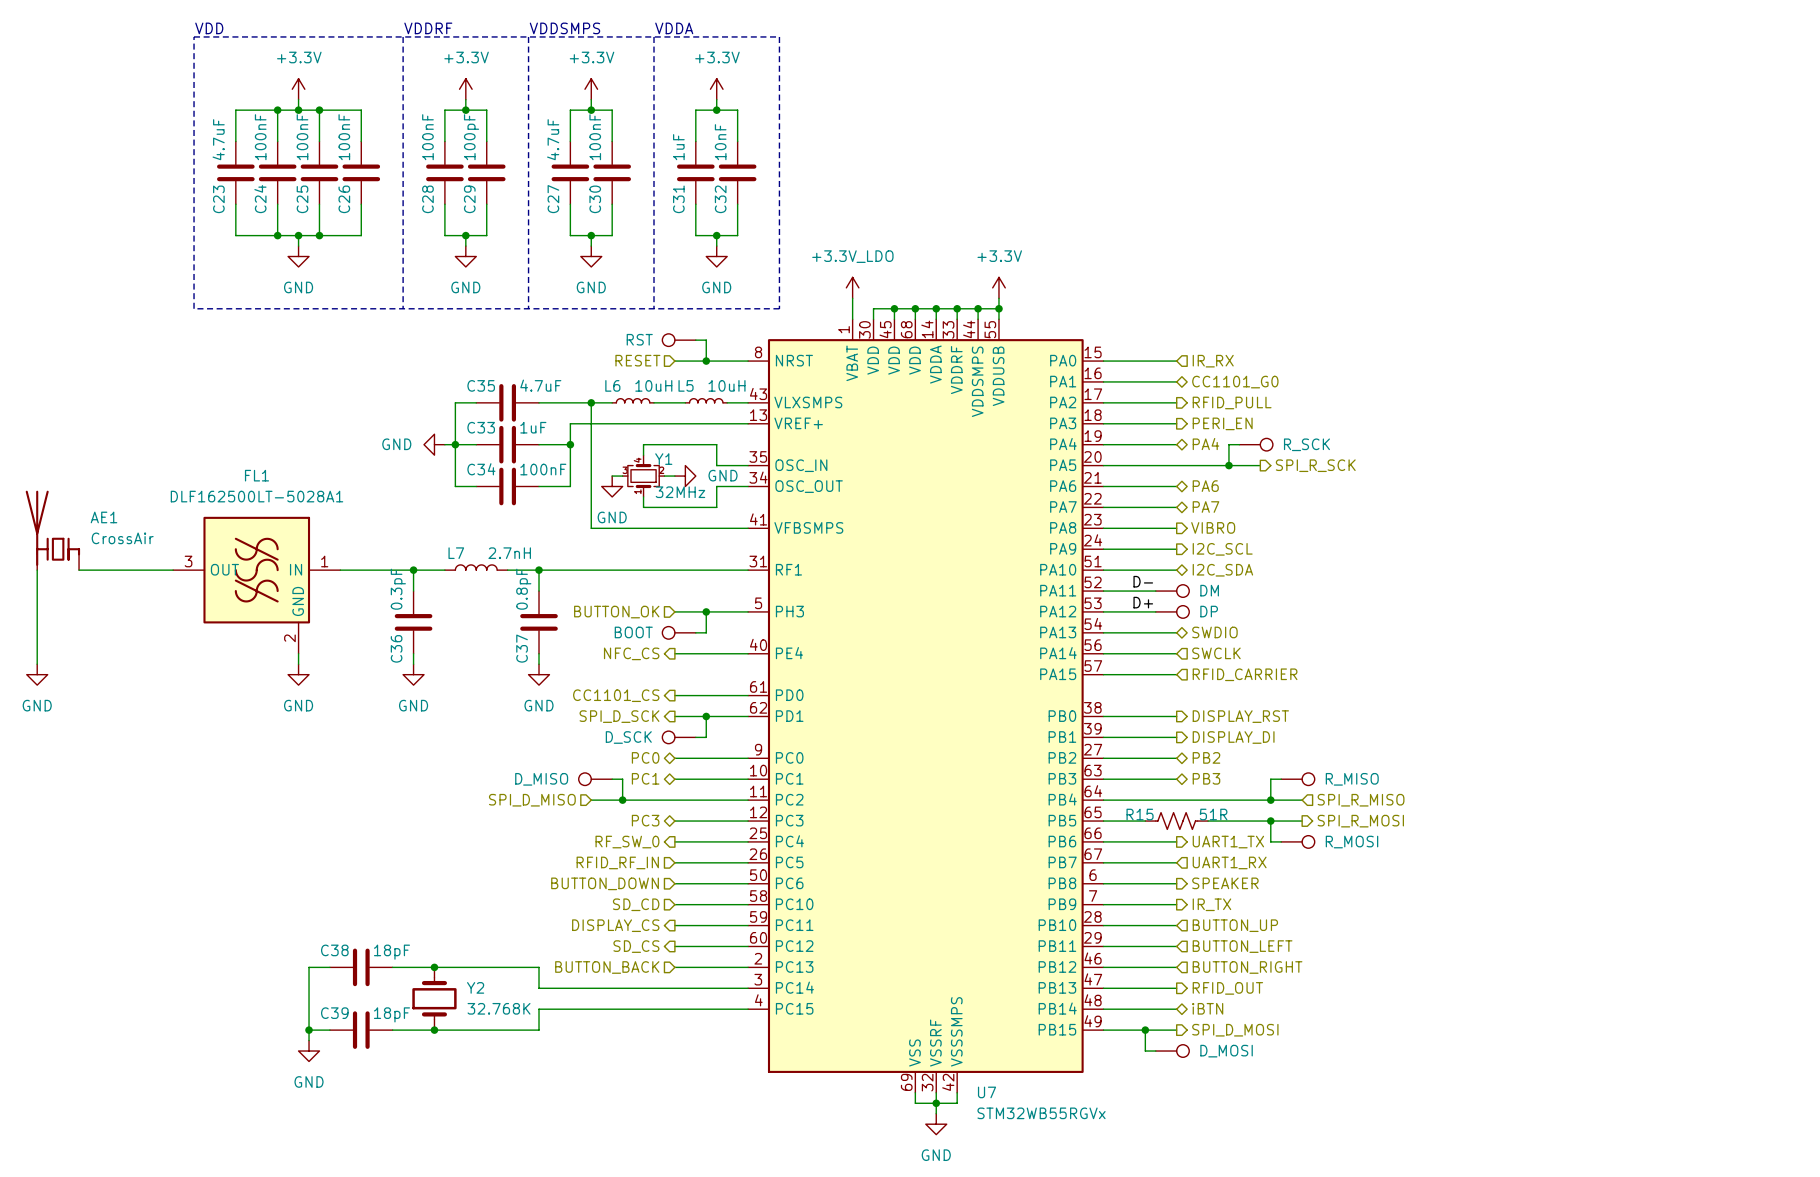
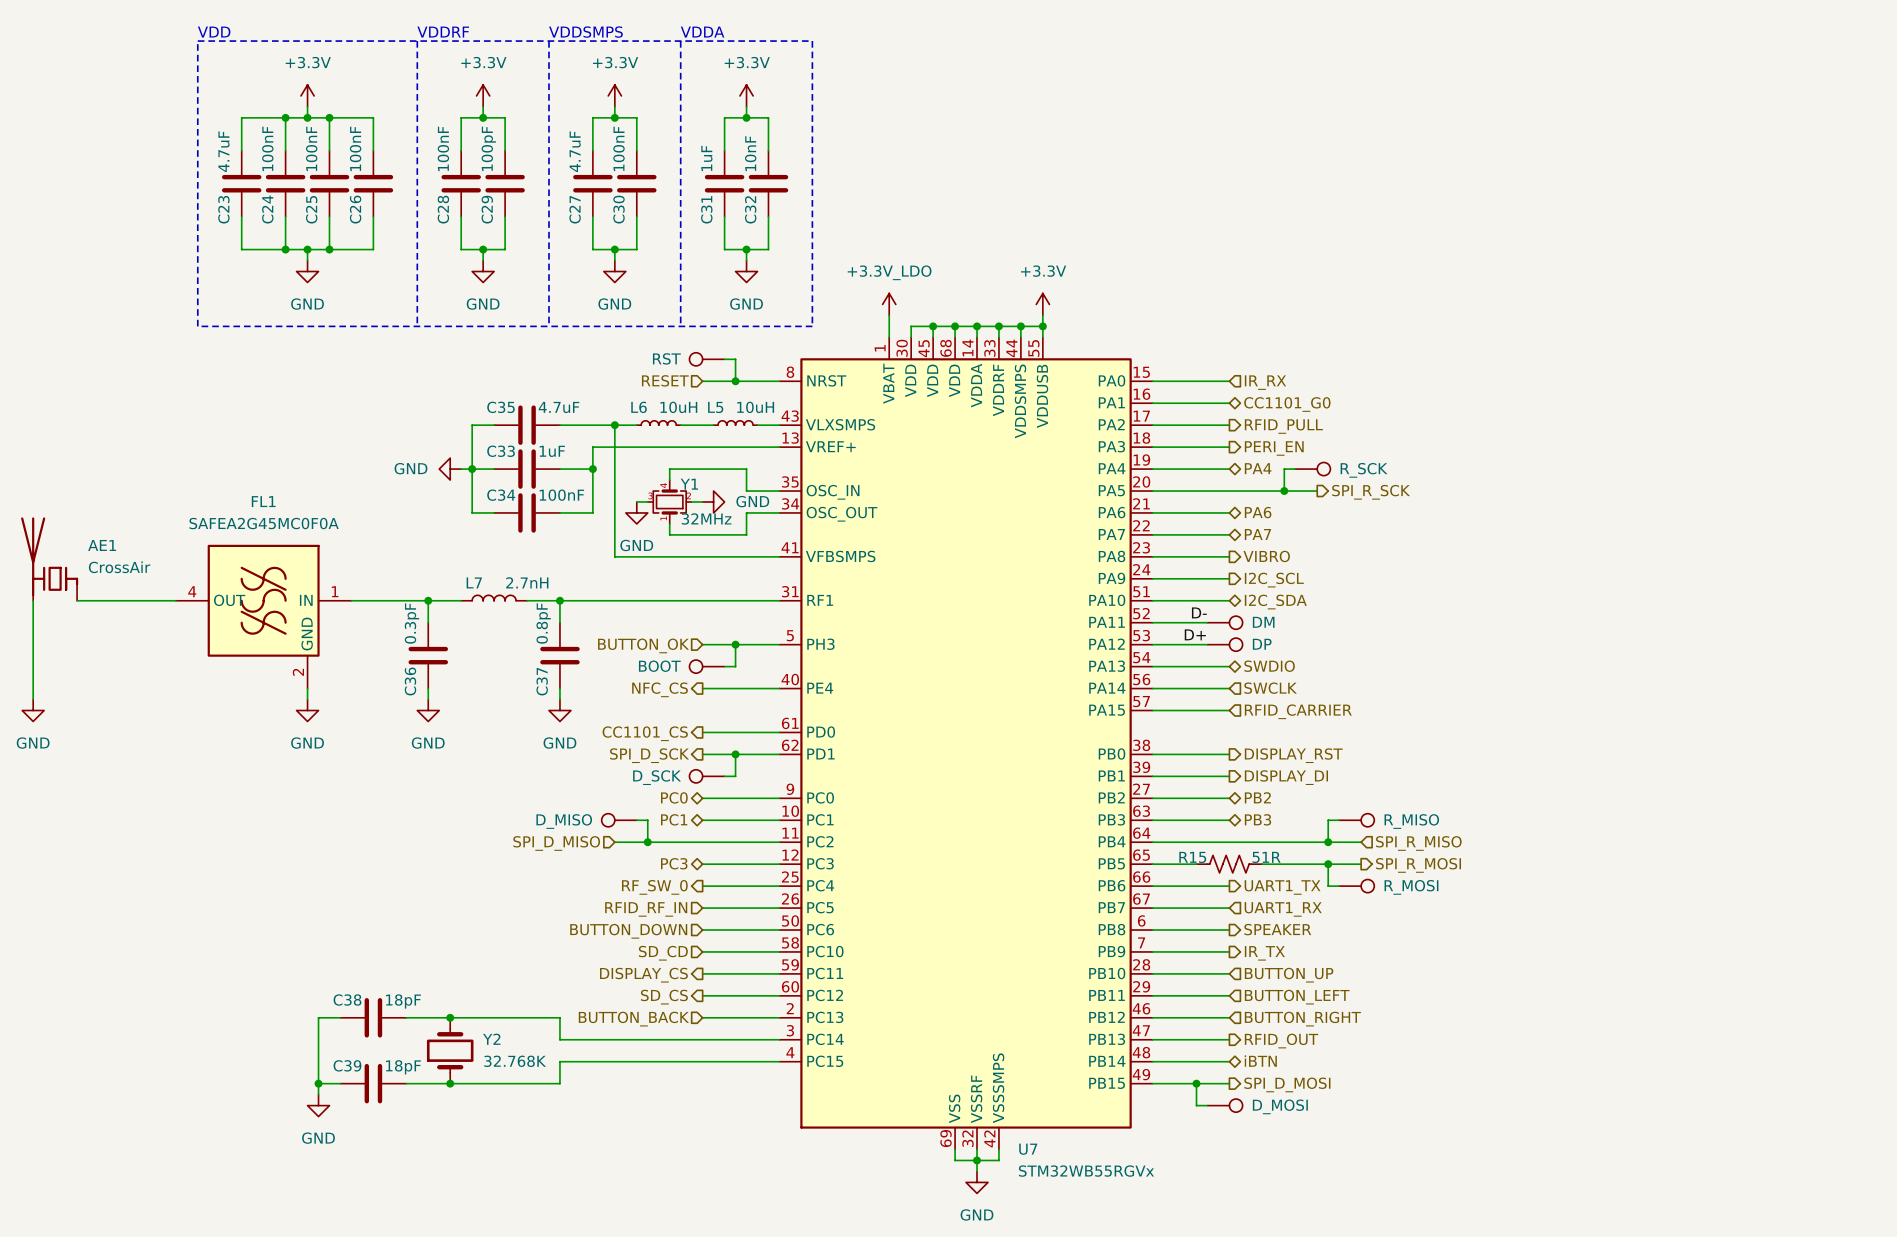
FL1 value: DLF162500LT-5028A1 (256, 496) -> SAFEA2G45MC0F0A (264, 523)
FL1 pin number: 3 (188, 561) -> 4 (192, 591)

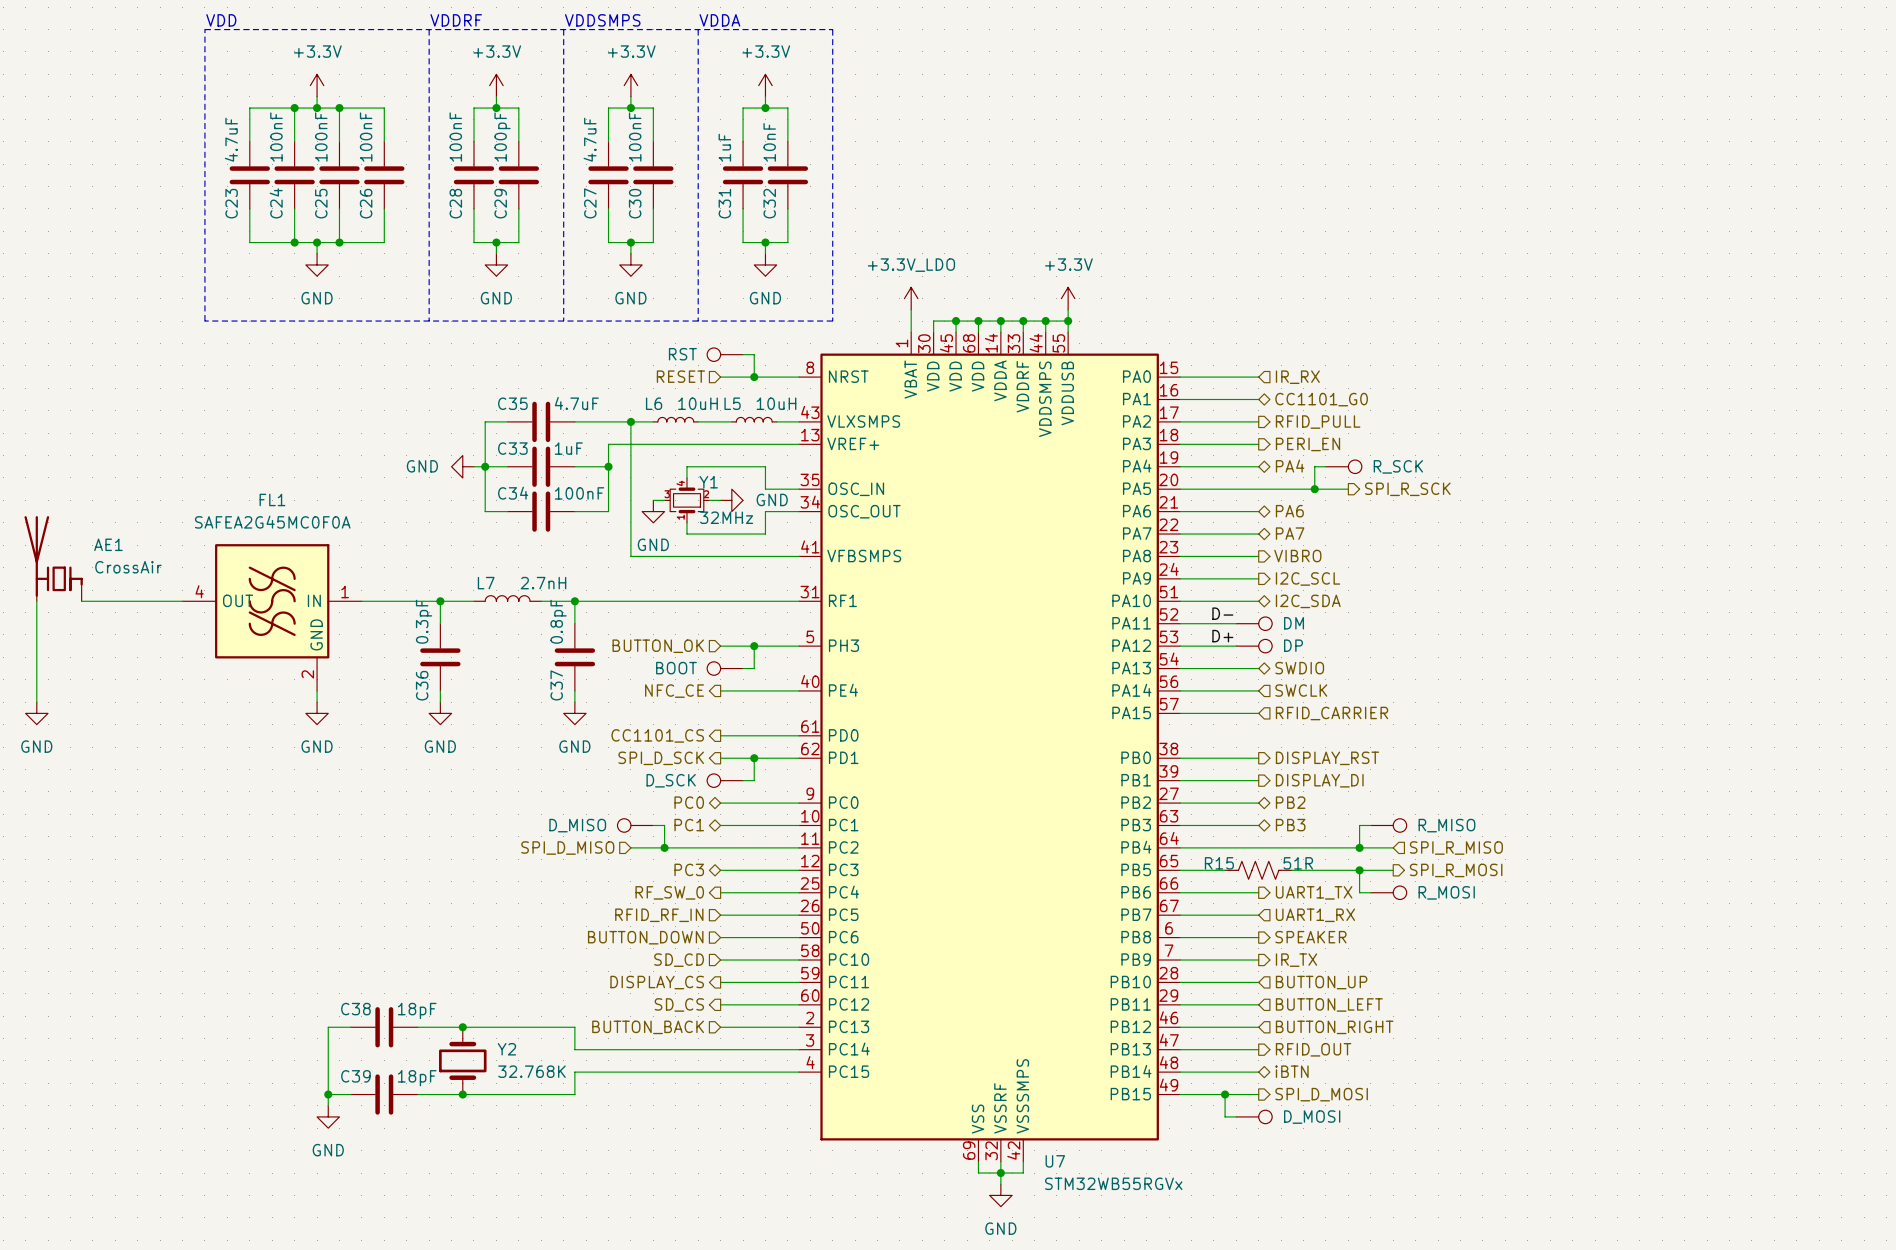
hierarchical label: NFC_CS (660, 689) -> NFC_CE (674, 691)

